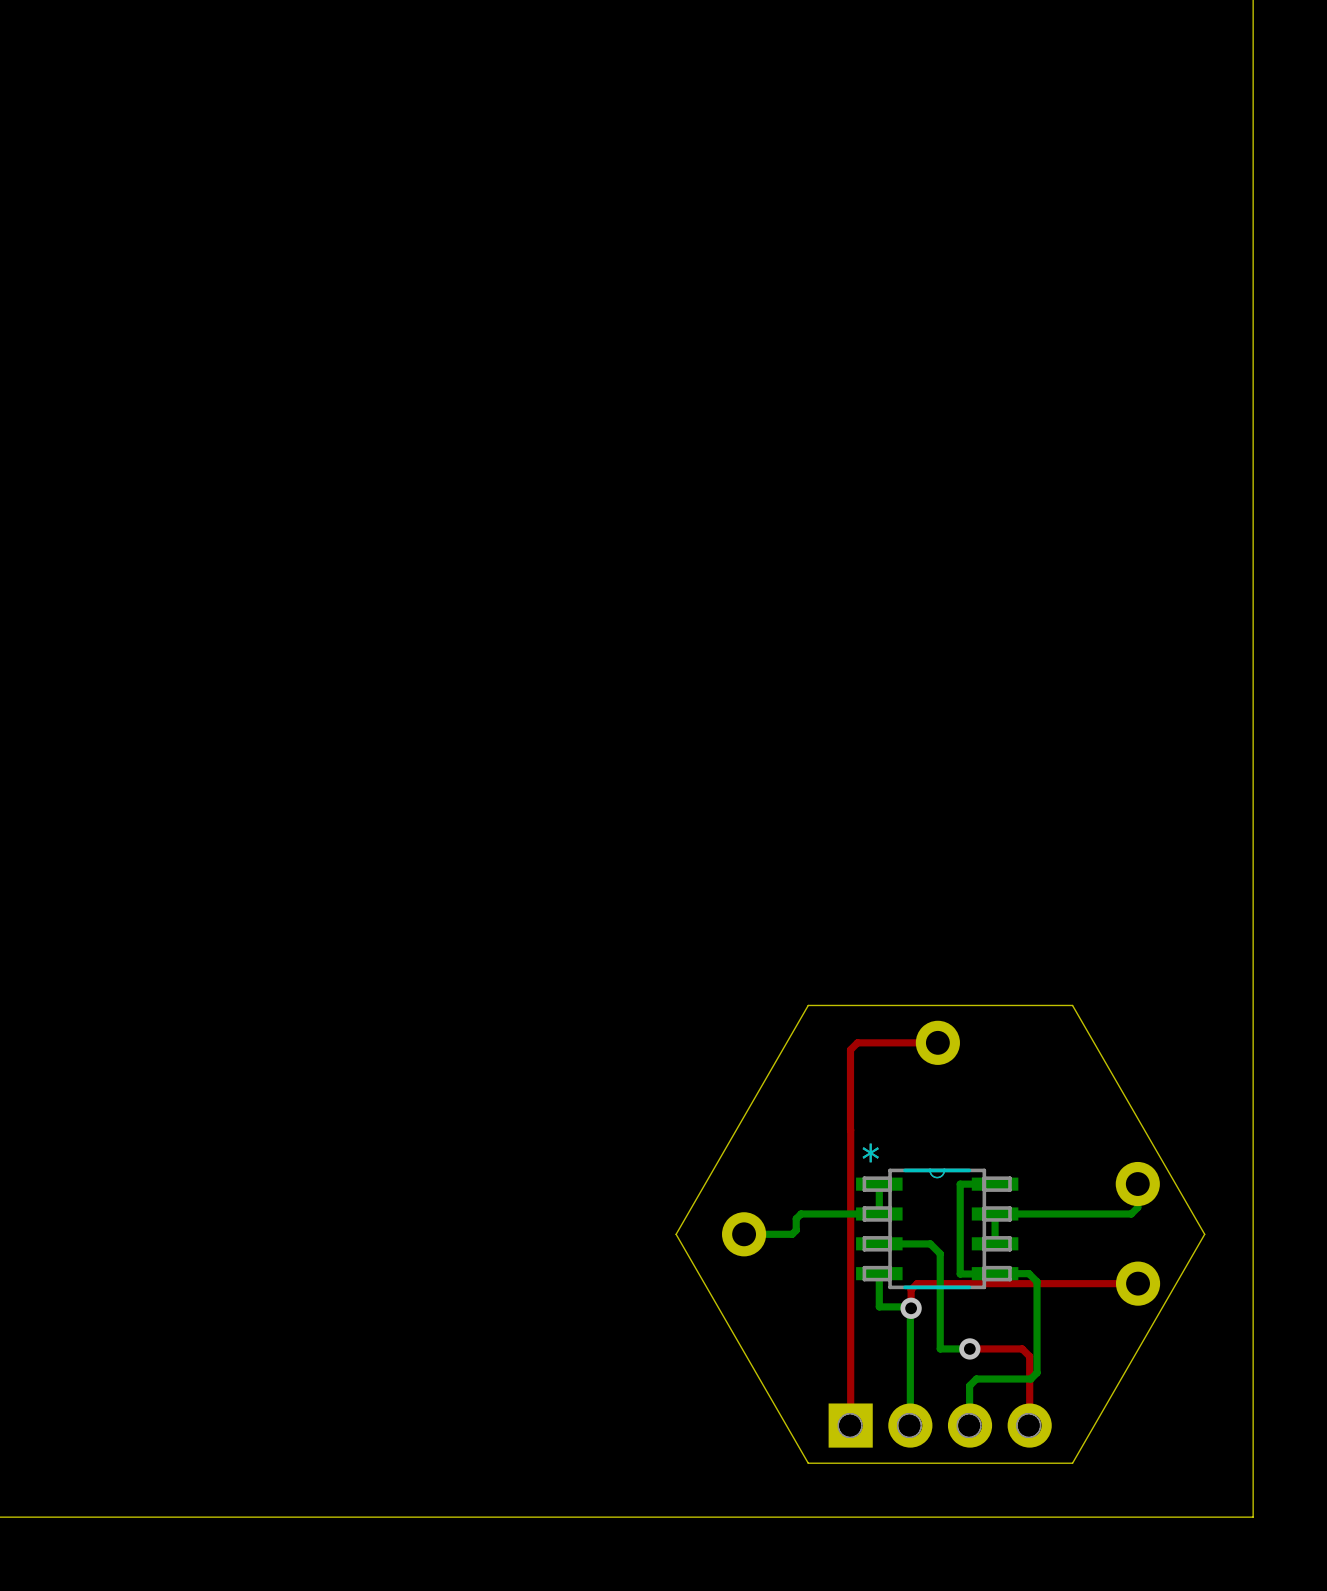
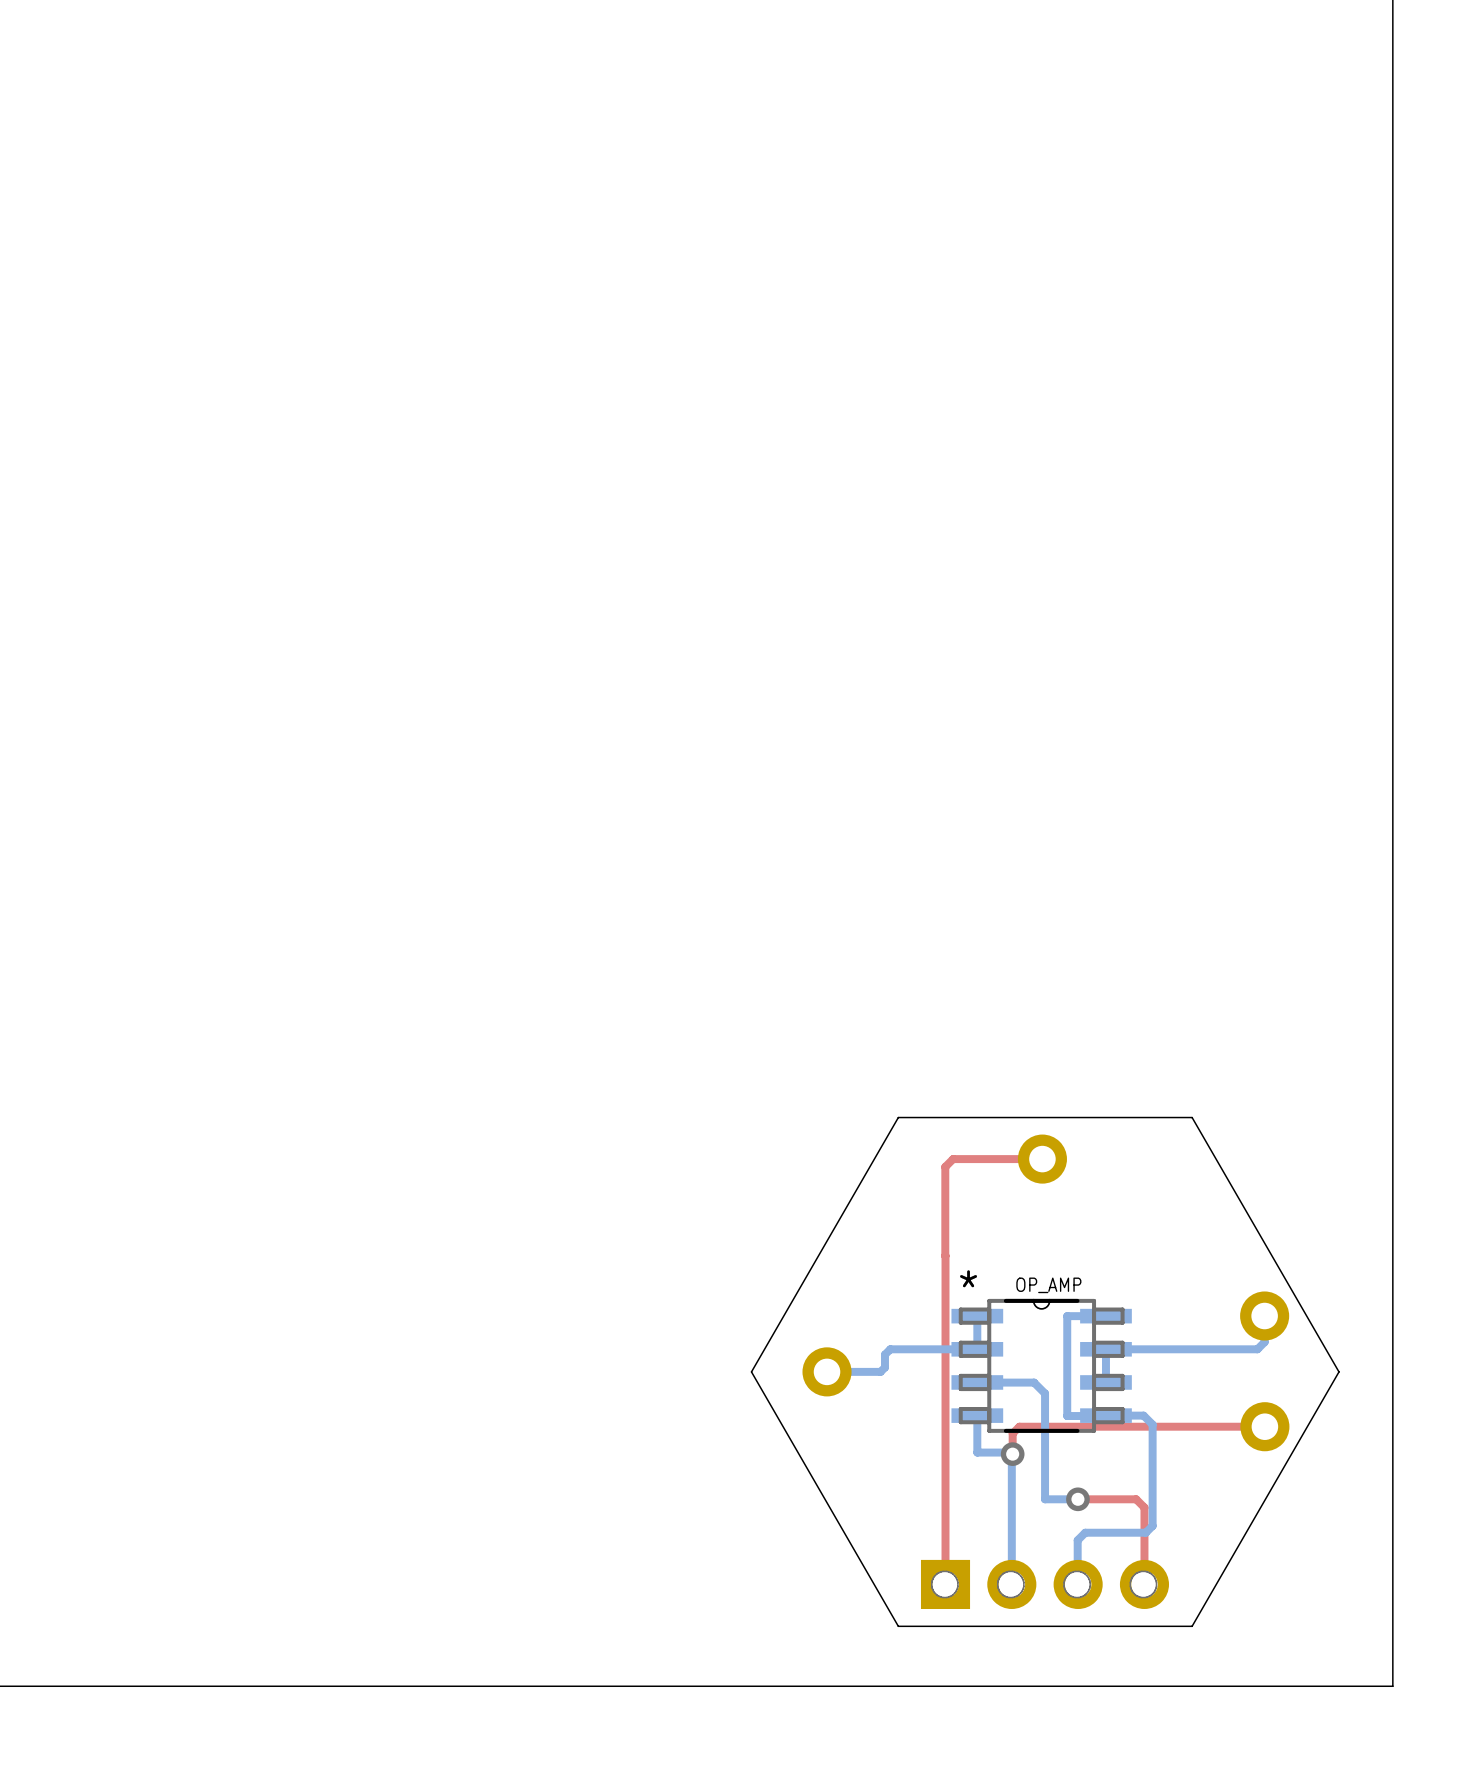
OP_AMP name: none -> OP_AMP (1048, 1285)

